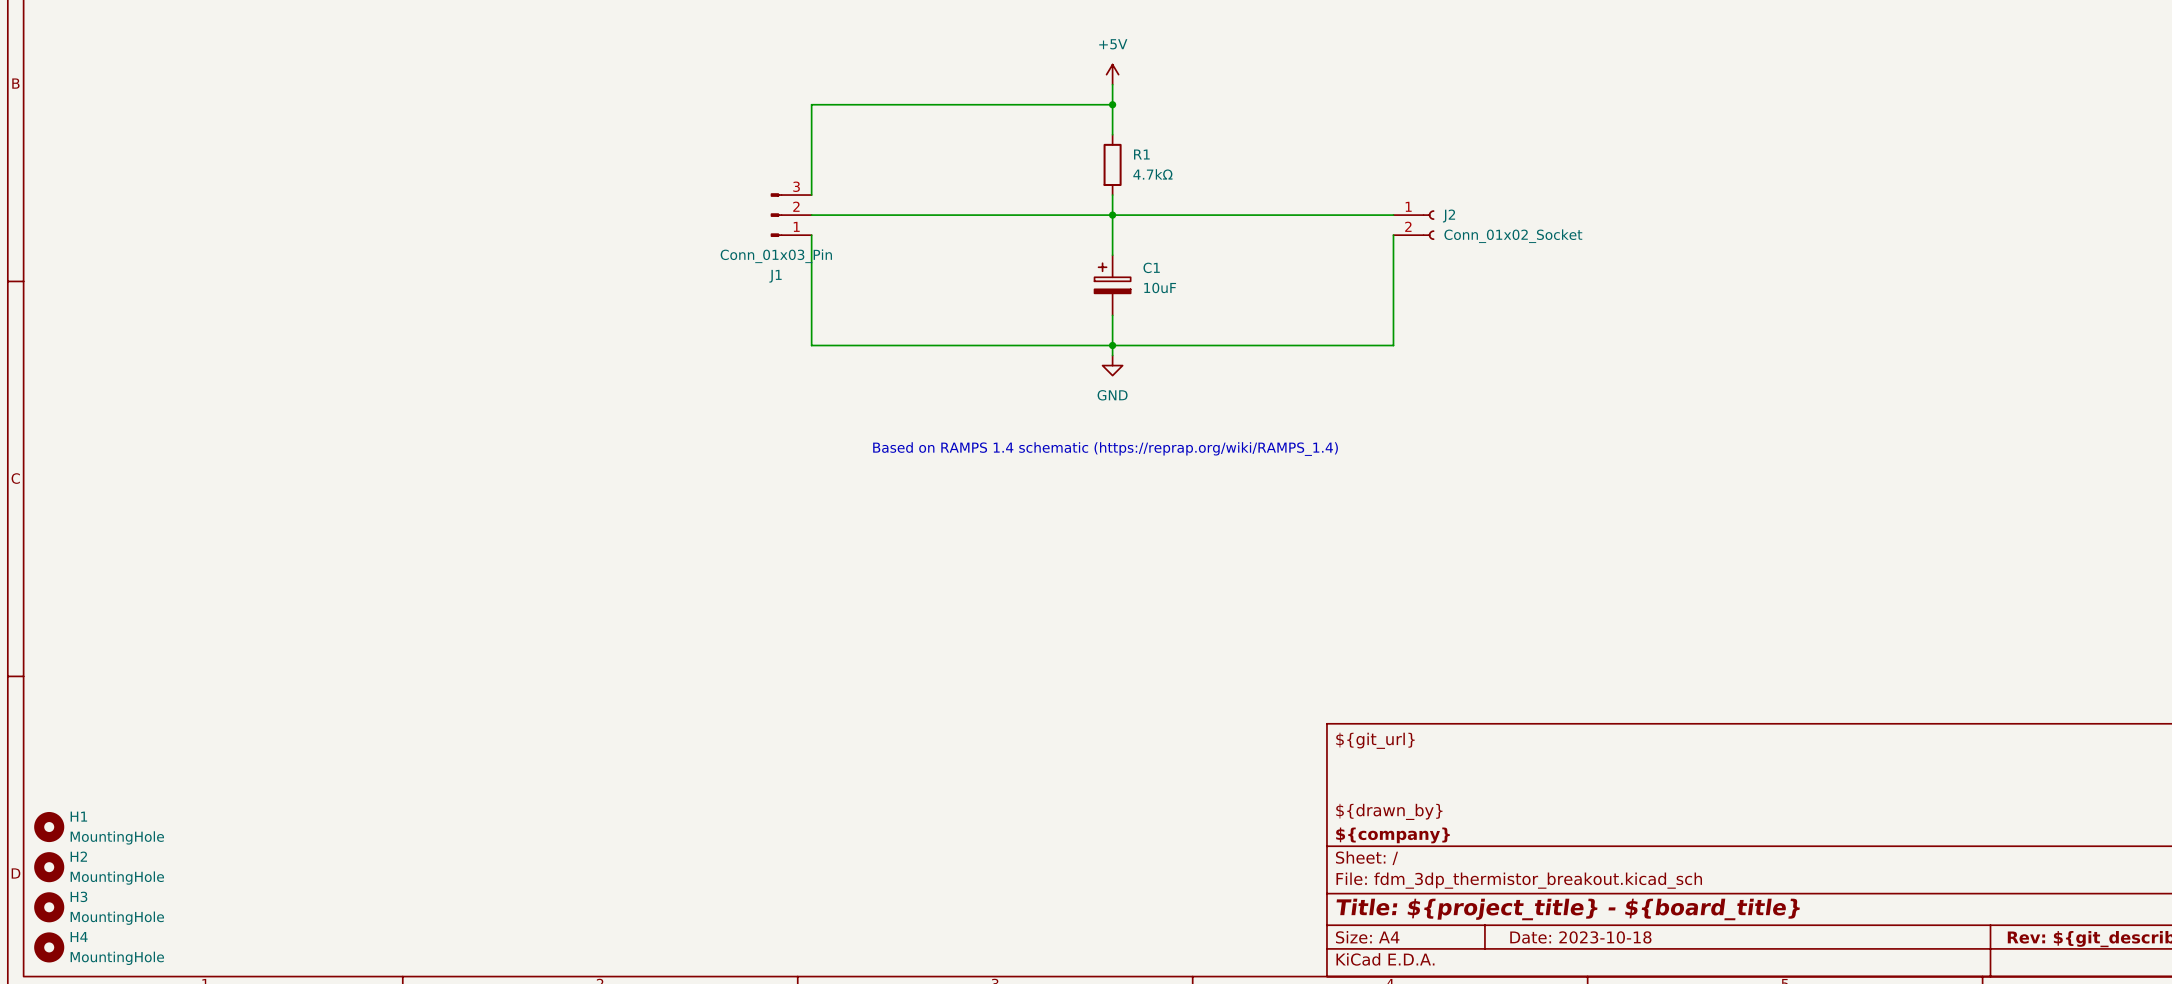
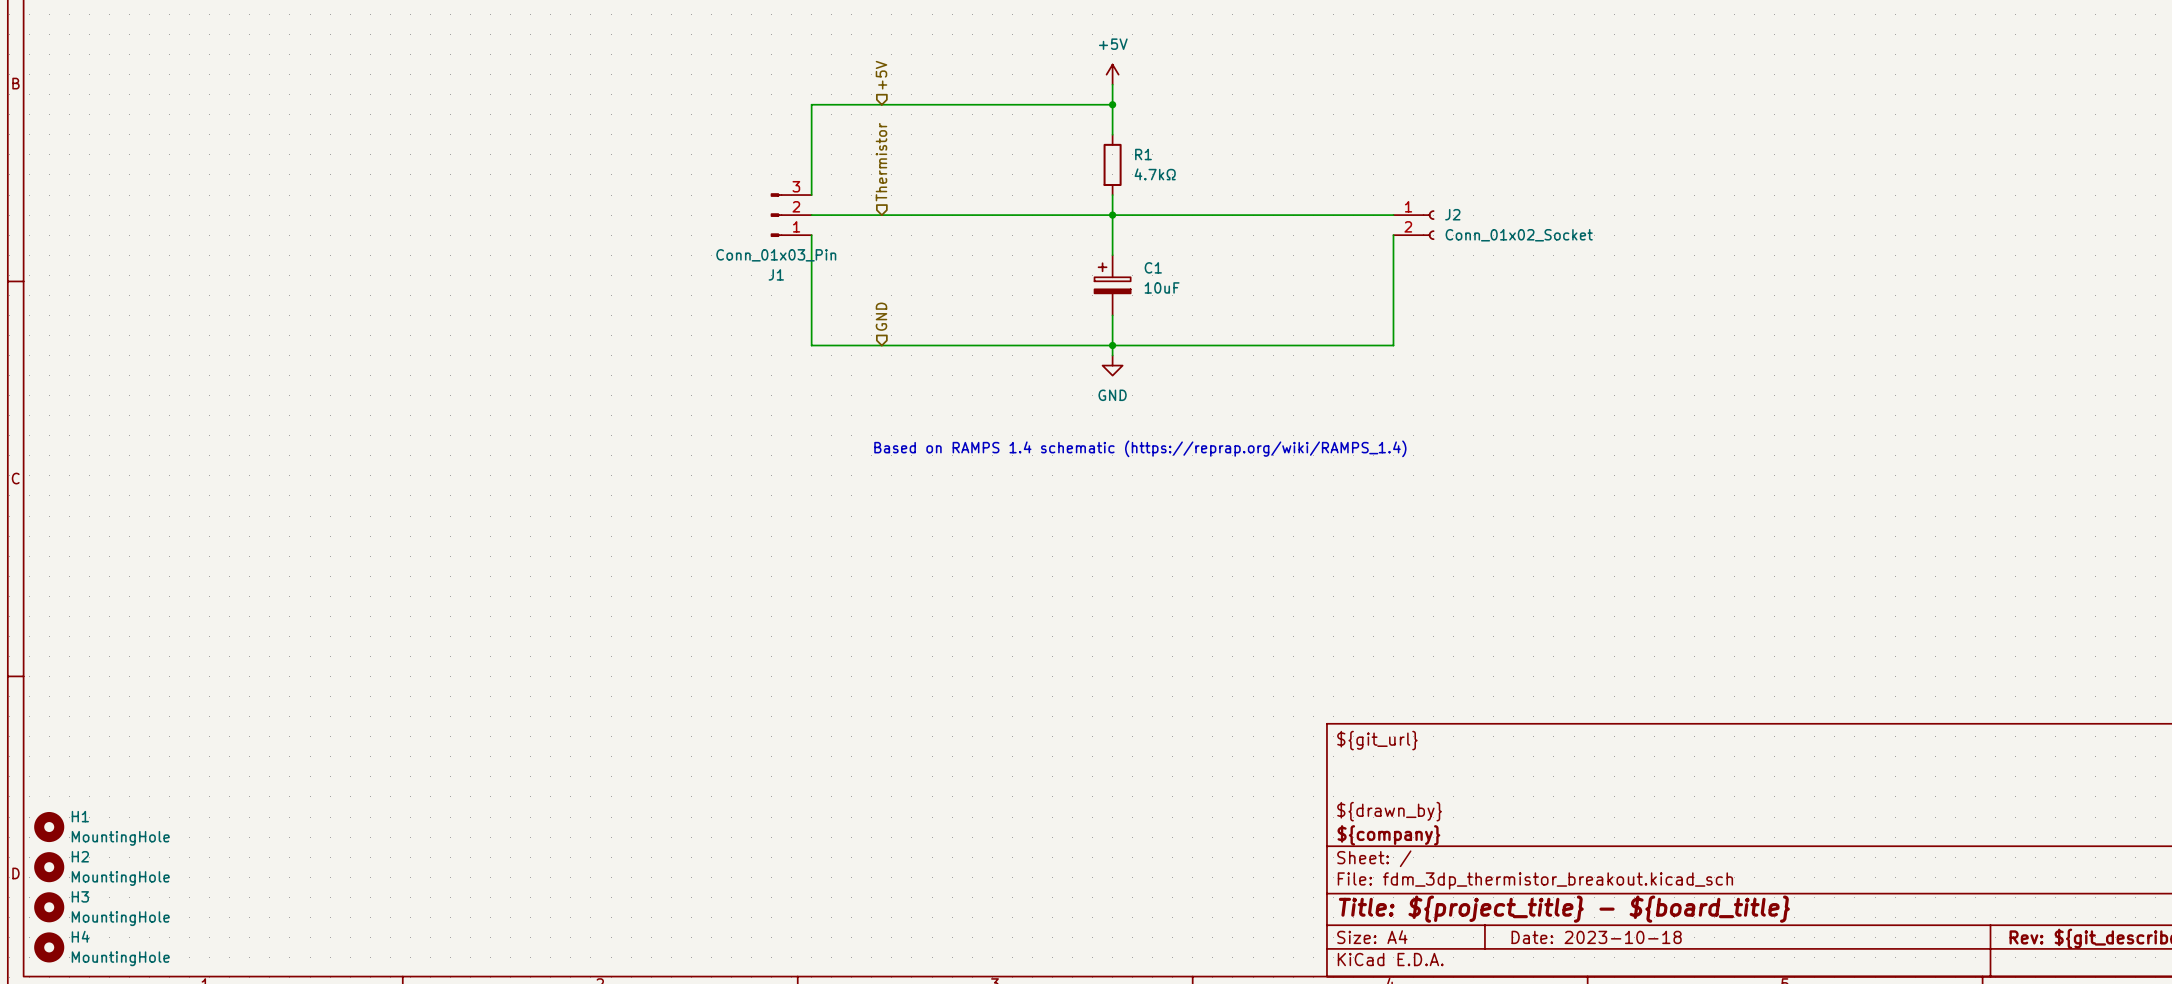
hierarchical label: none -> +5V (881, 75)
hierarchical label: none -> Thermistor (881, 162)
hierarchical label: none -> GND (881, 316)

